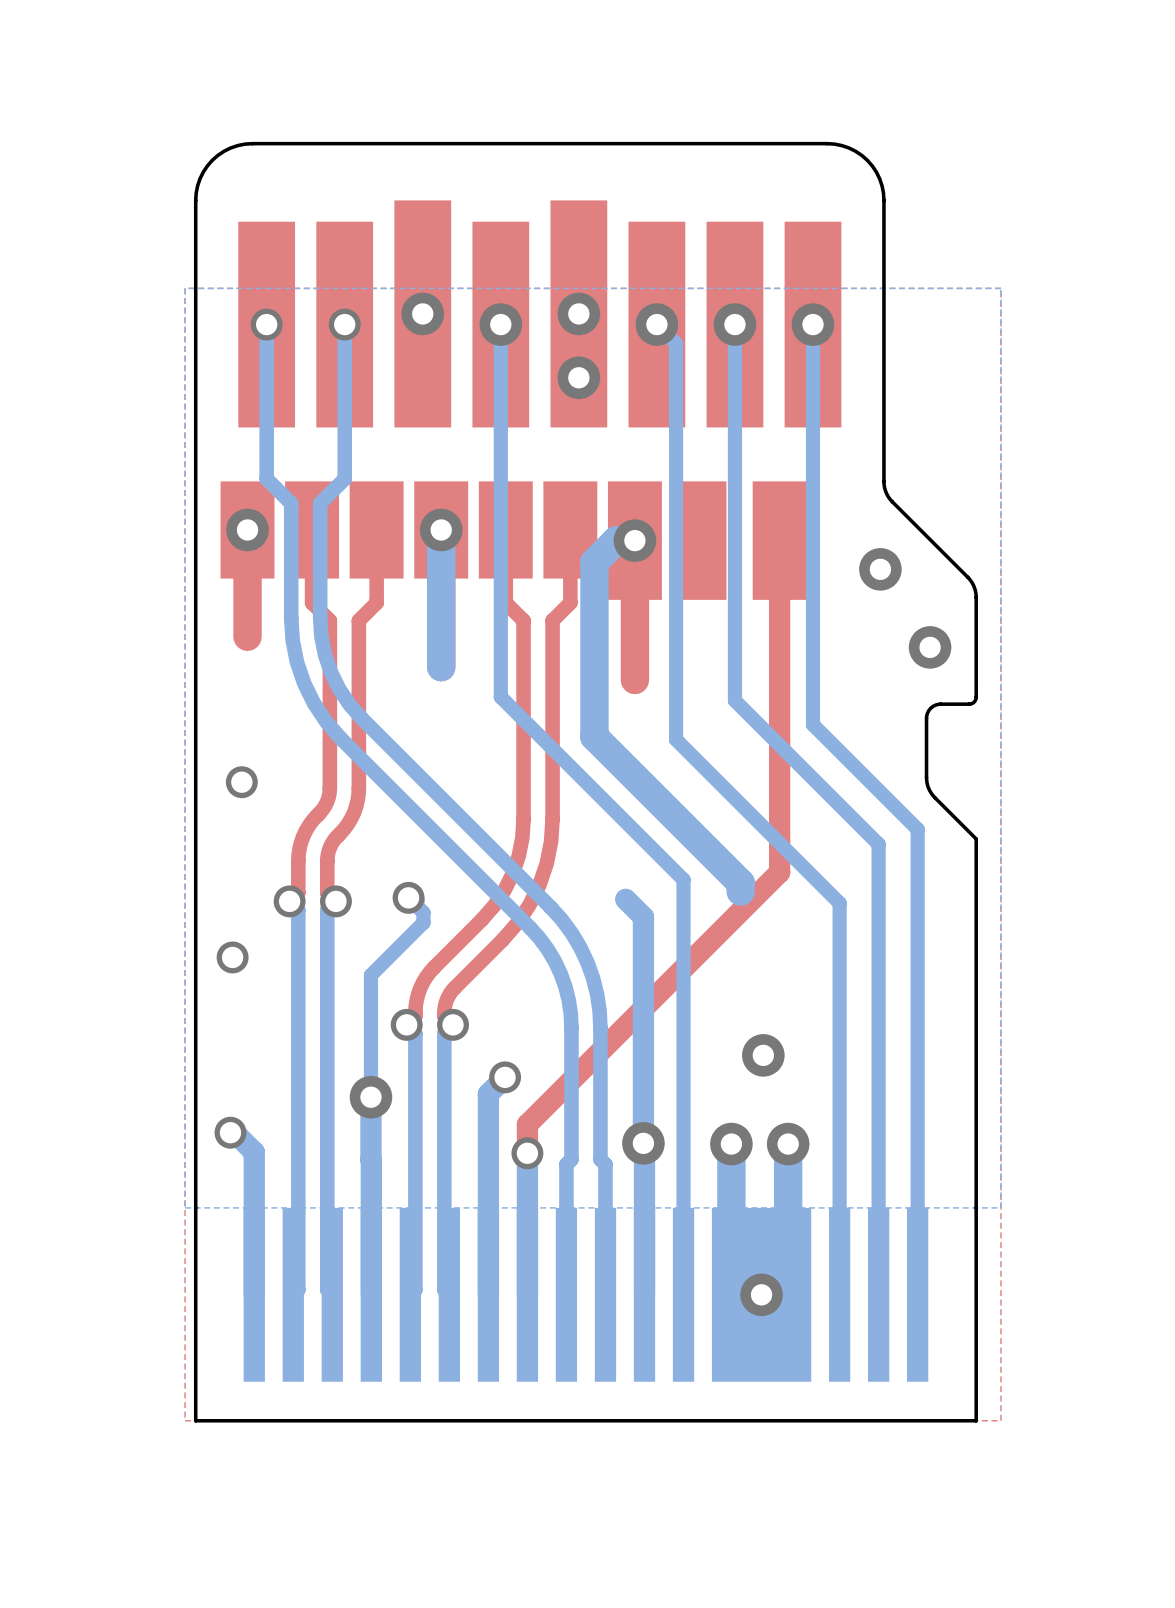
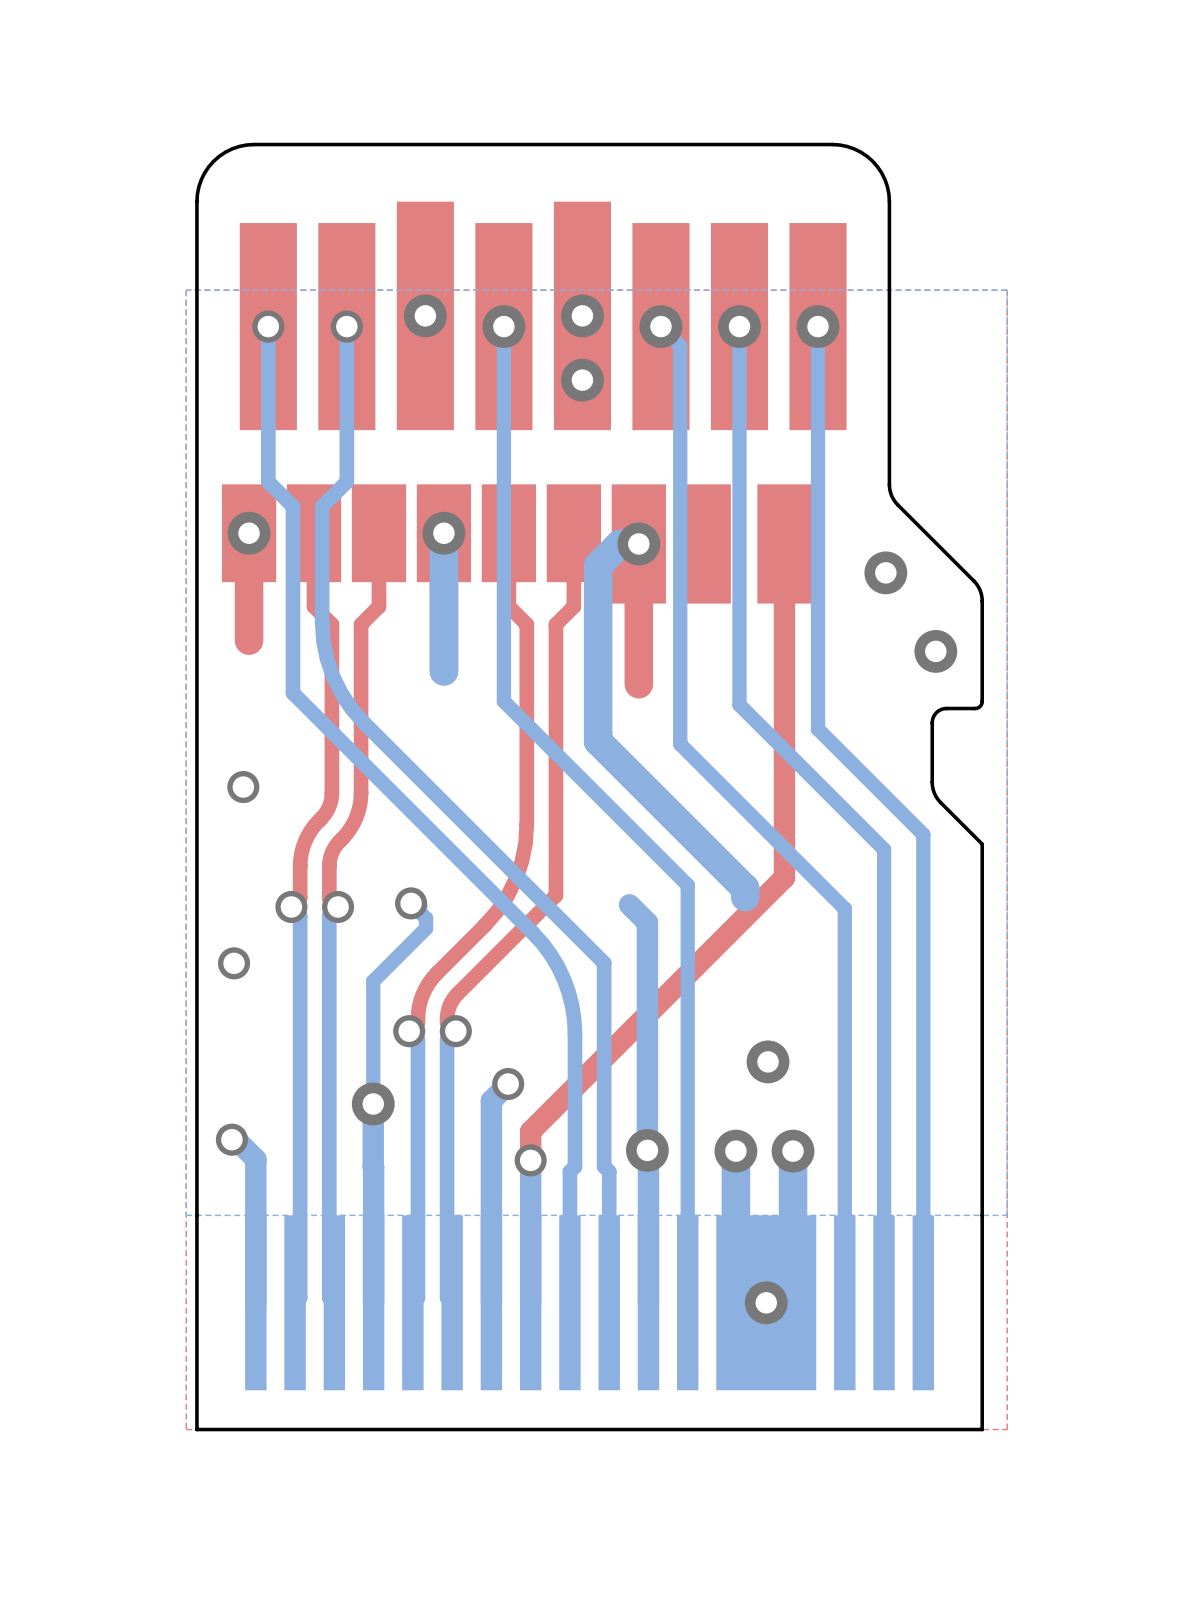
bottom track: (291, 618) (297, 662) (304, 683) (314, 703) (341, 738) -> (293, 621) (293, 693) (343, 743)
top track: (552, 819) (551, 841) (539, 884) (517, 923) (502, 940) -> (555, 824) (555, 895) (505, 945)
bottom track: (550, 907) (571, 932) (587, 962) (597, 994) (600, 1027) -> (553, 912) (604, 963) (604, 1034)

